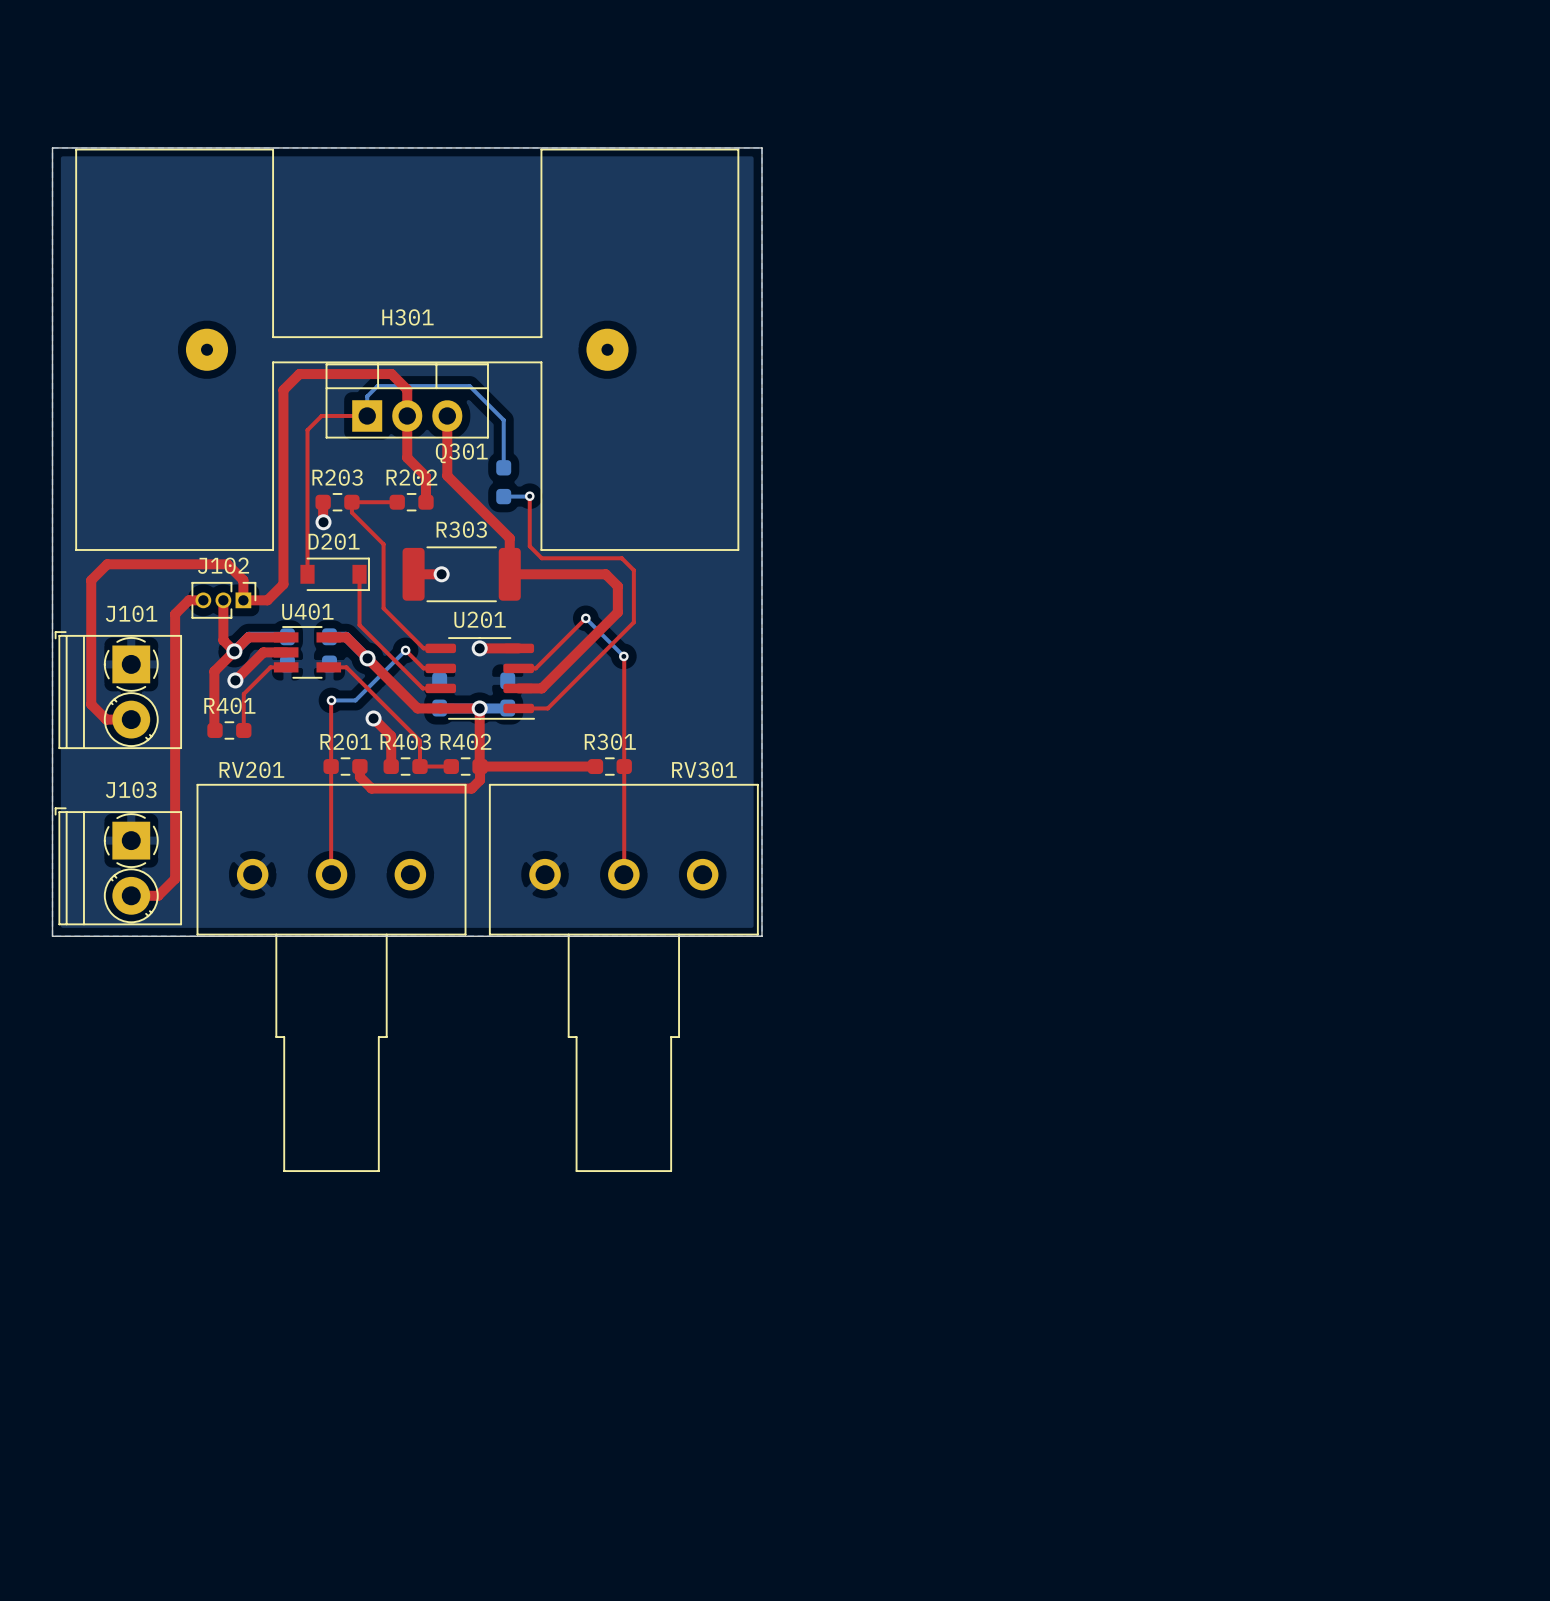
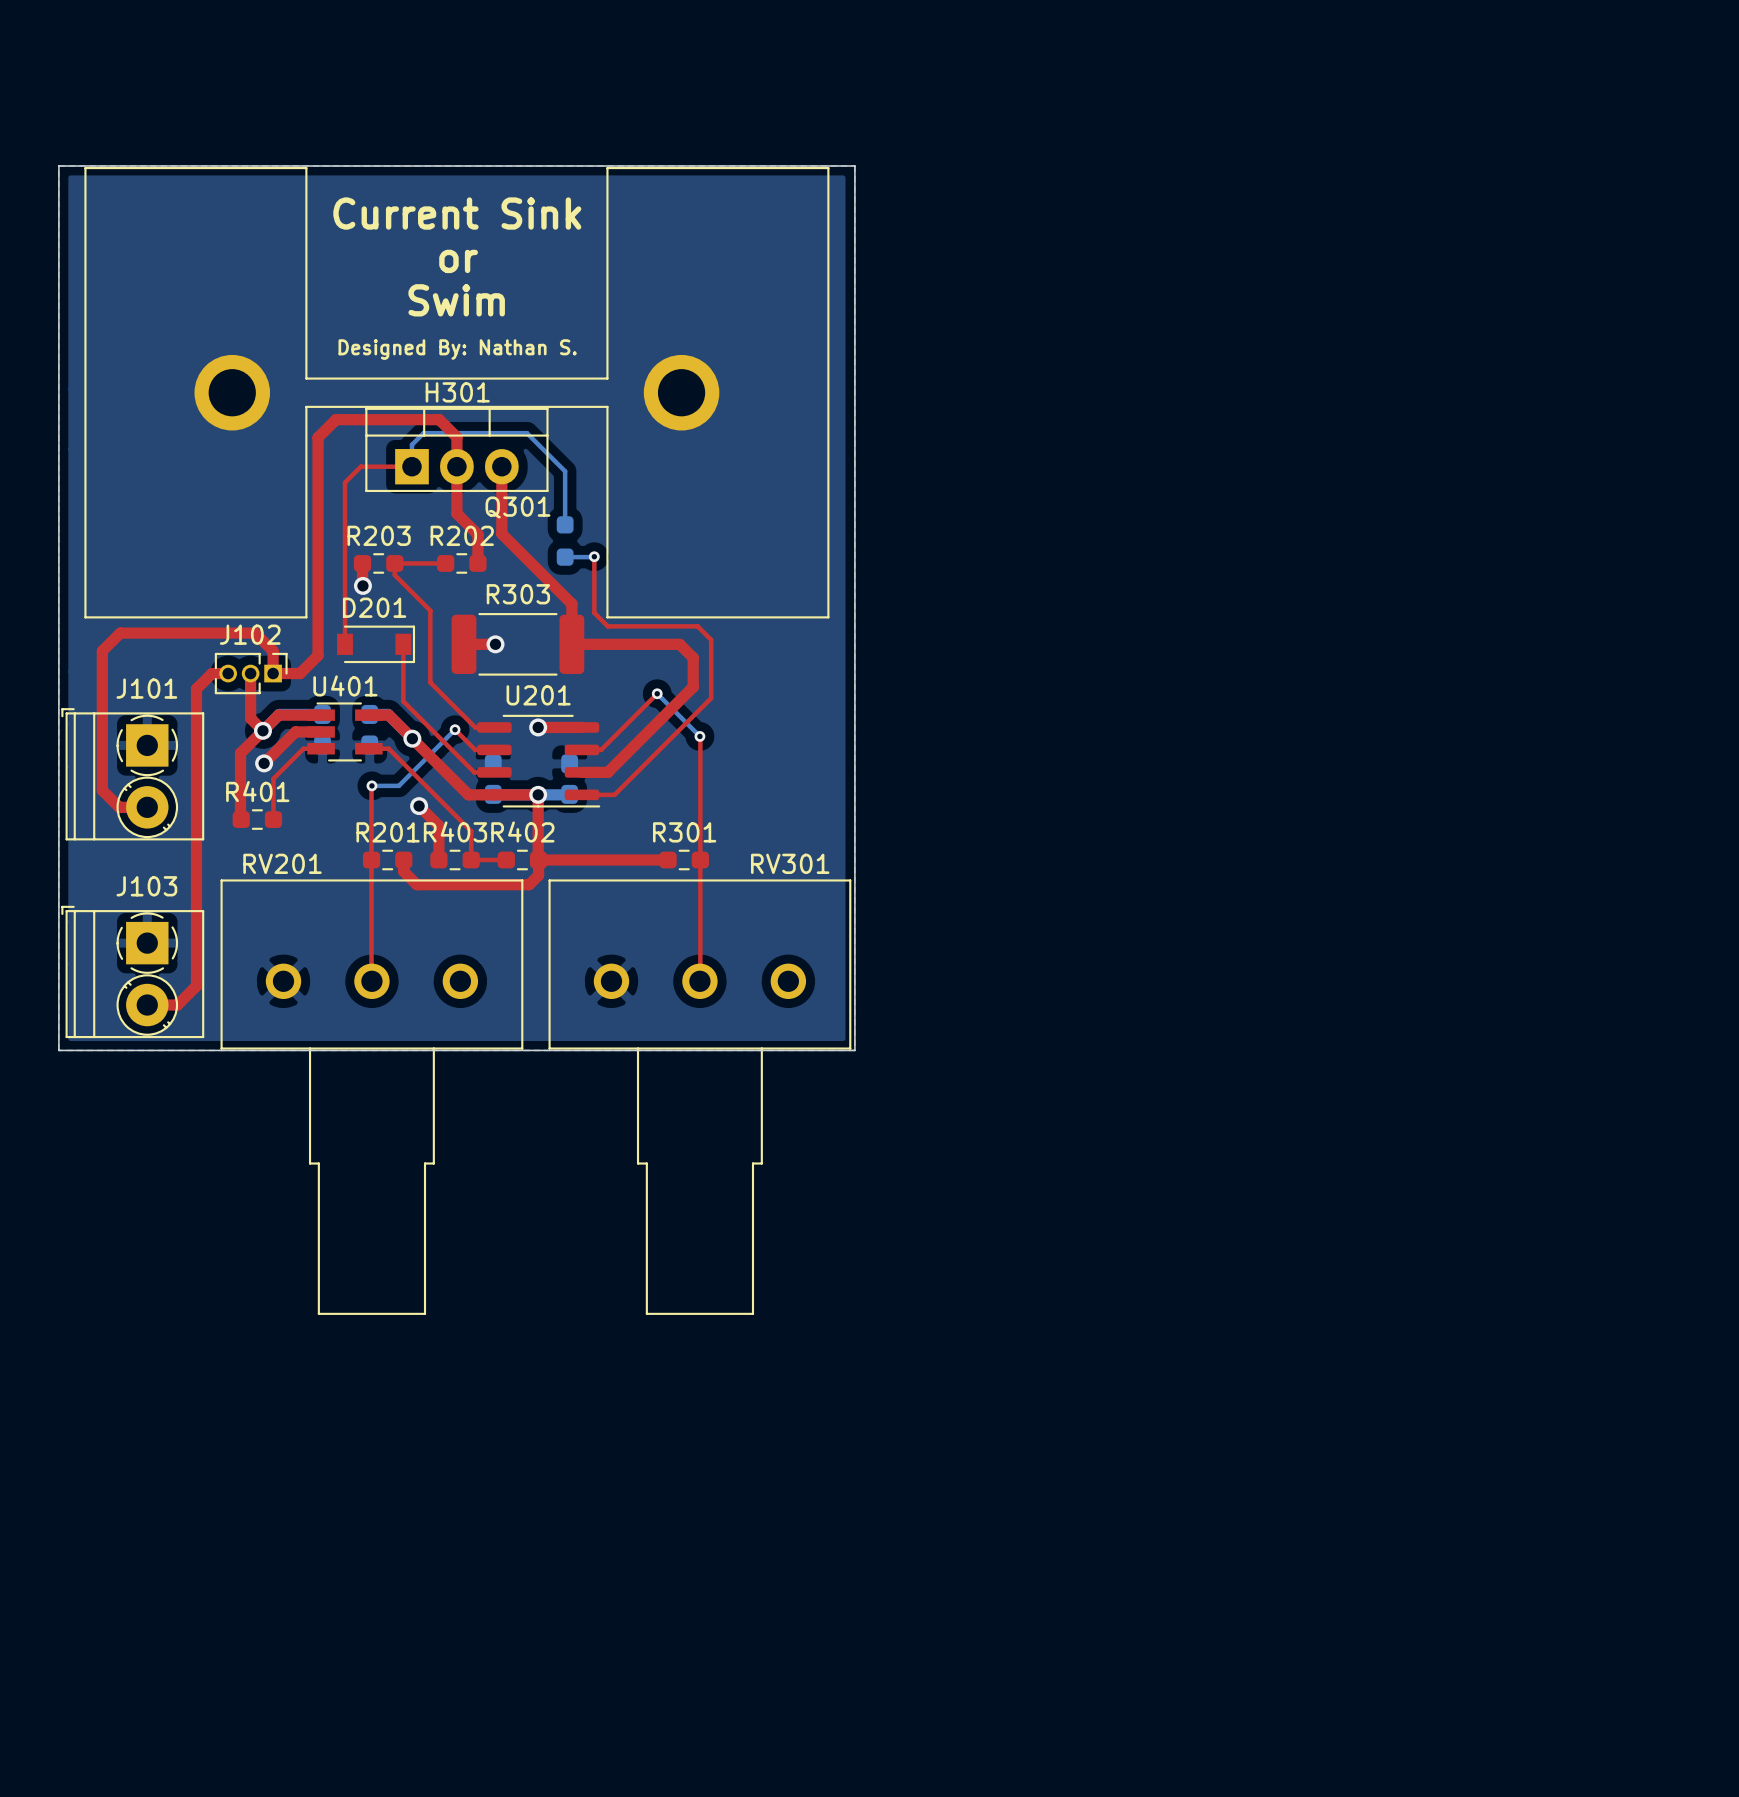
H301 footprint: [75, 148, 740, 551] -> [84, 167, 830, 619]
text: none -> Current Sink (457, 213)
text: none -> or (458, 261)
text: none -> Swim (456, 300)
text: none -> Designed By: Nathan S. (457, 349)
H301 name position: H301 (407, 317) -> H301 (457, 392)

